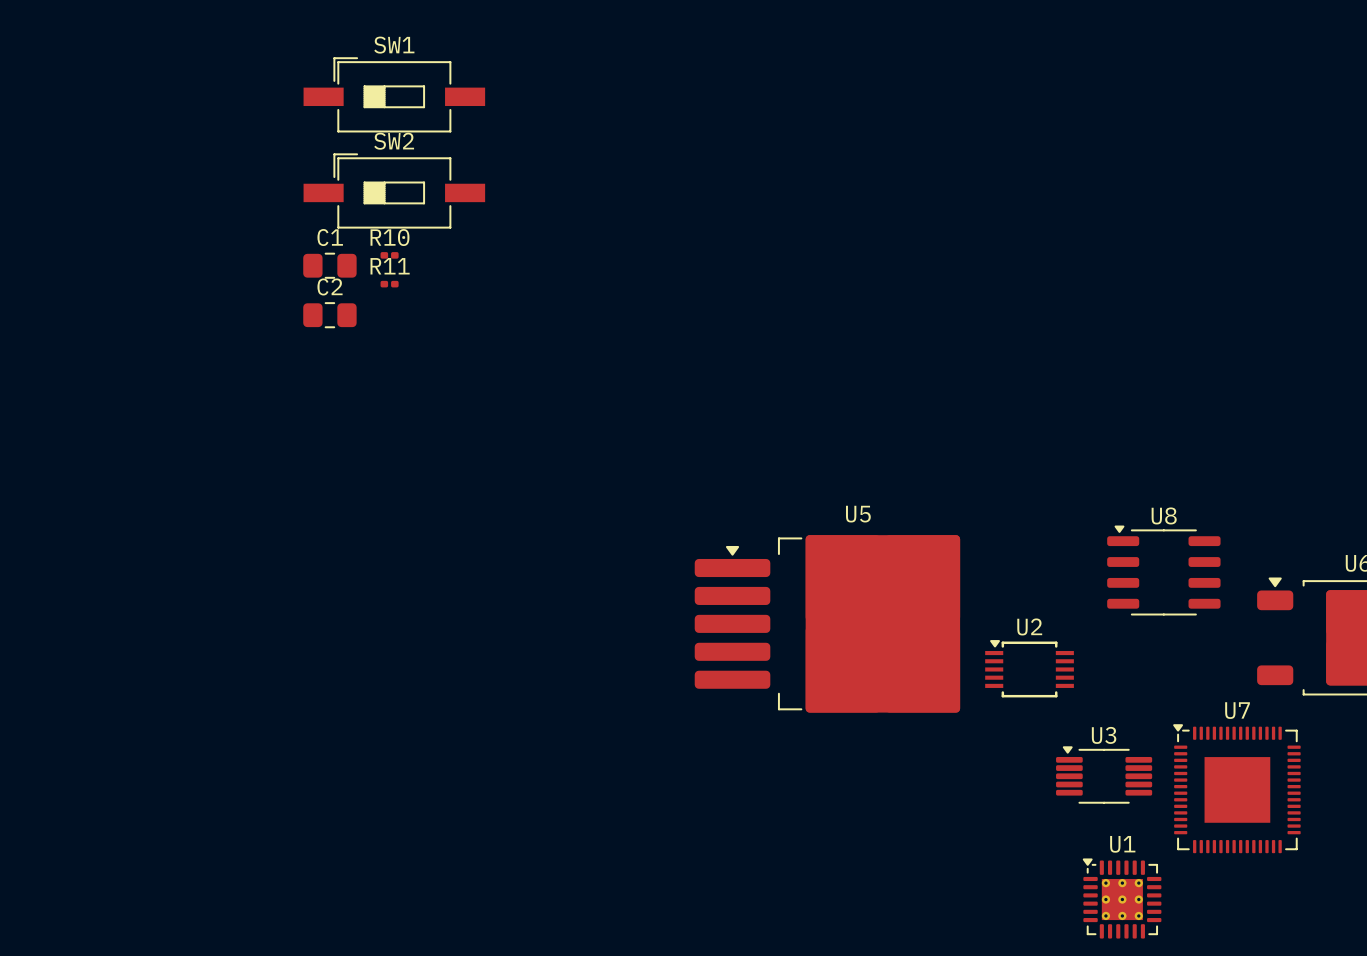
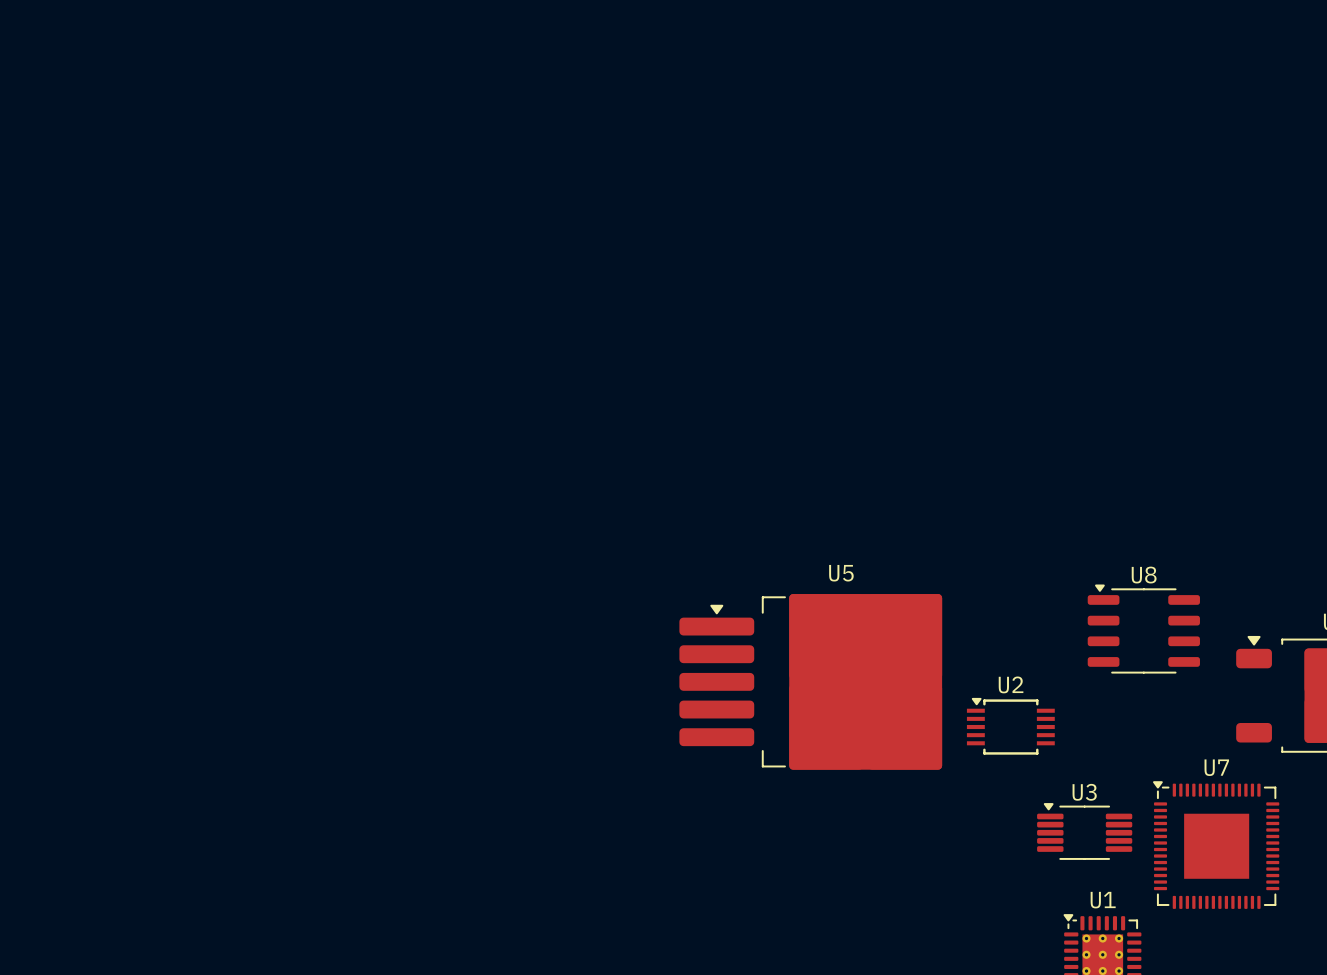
SW1: (394, 94) -> none
SW2: (394, 190) -> none
R10: (389, 255) -> none
C1: (329, 265) -> none
R11: (389, 284) -> none
C2: (329, 315) -> none

